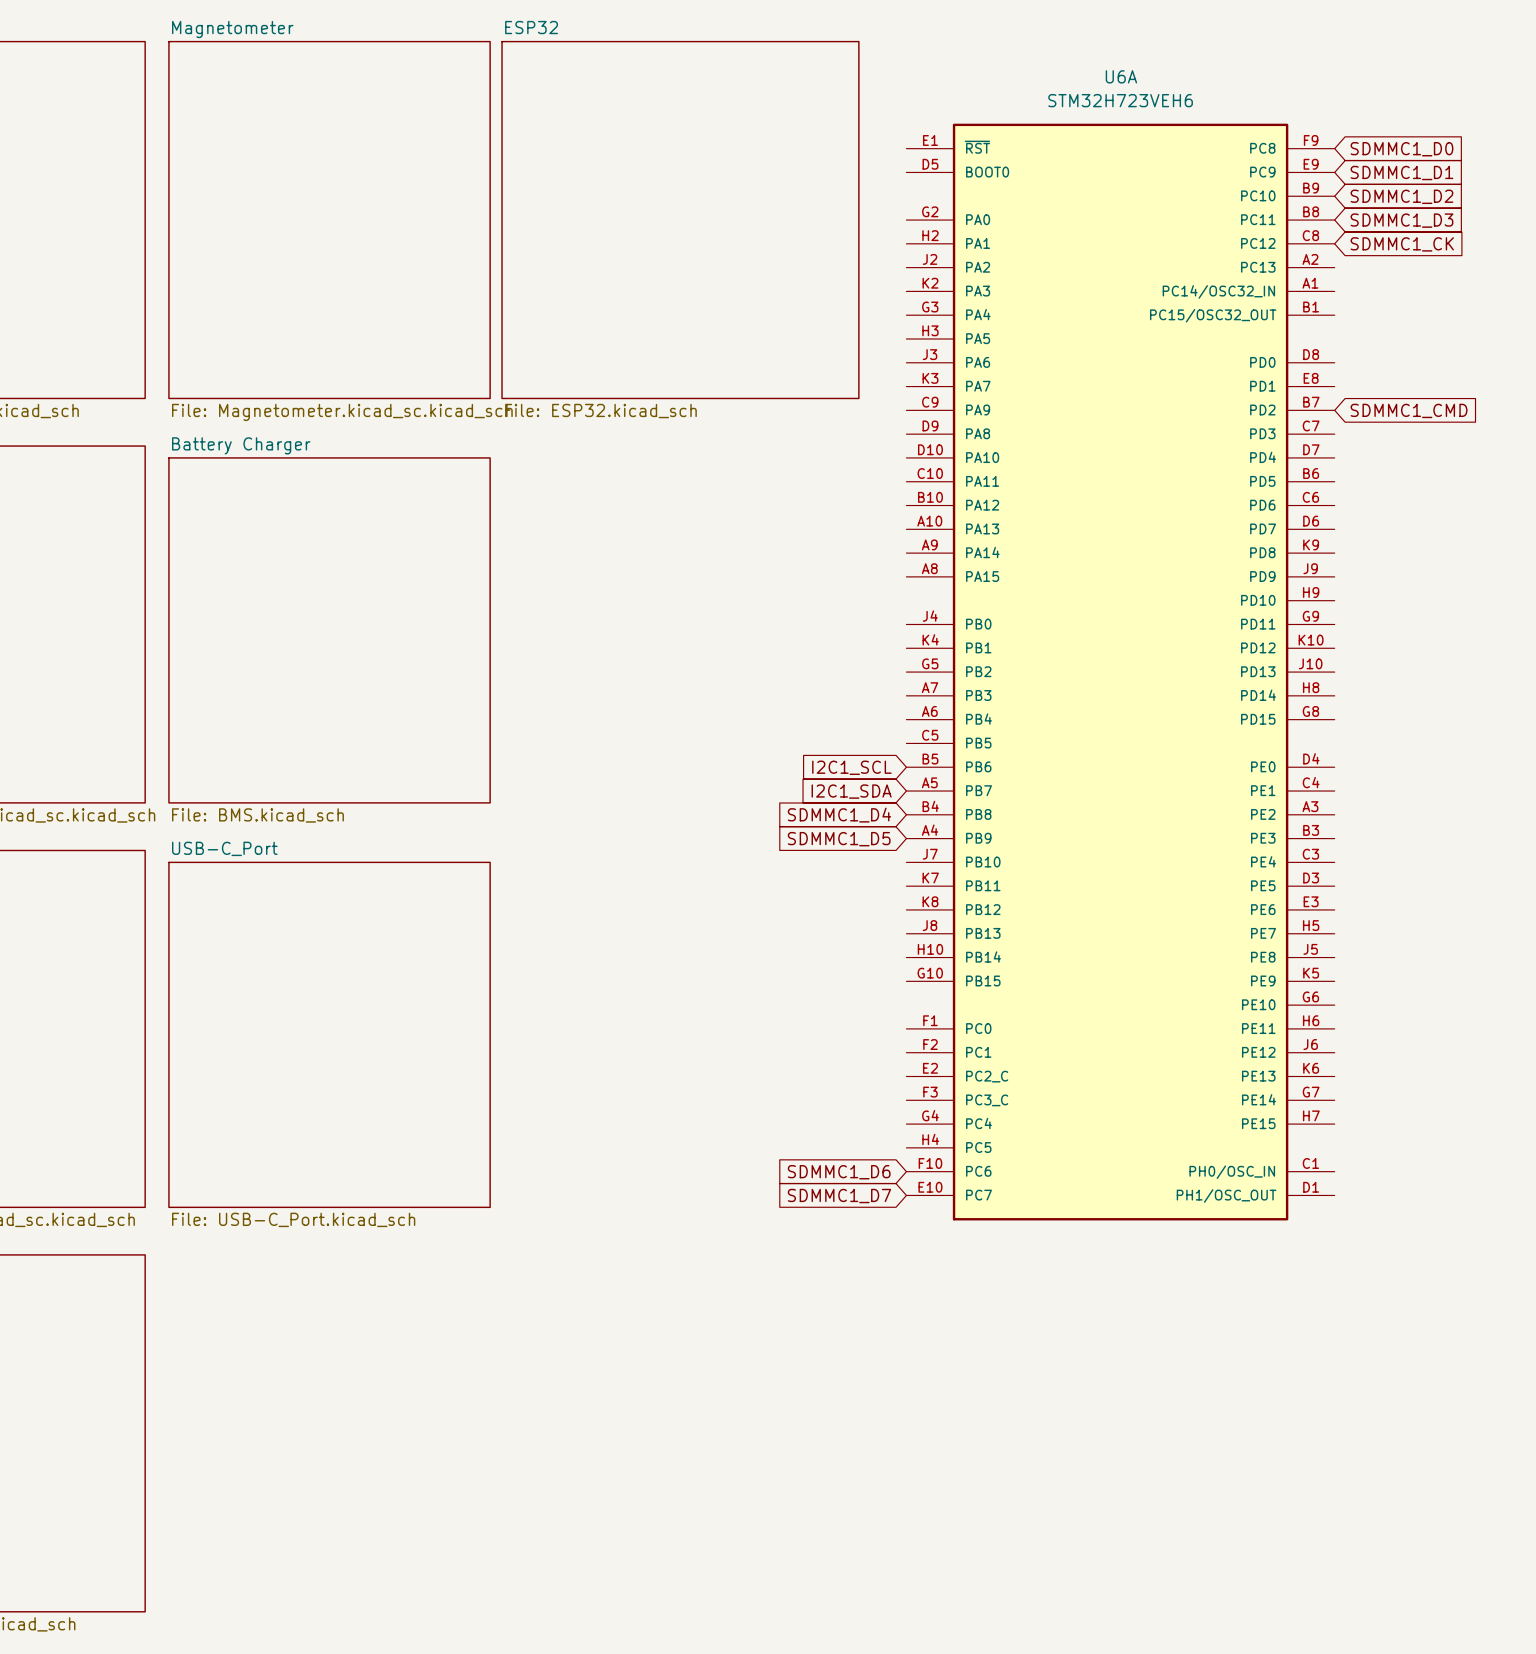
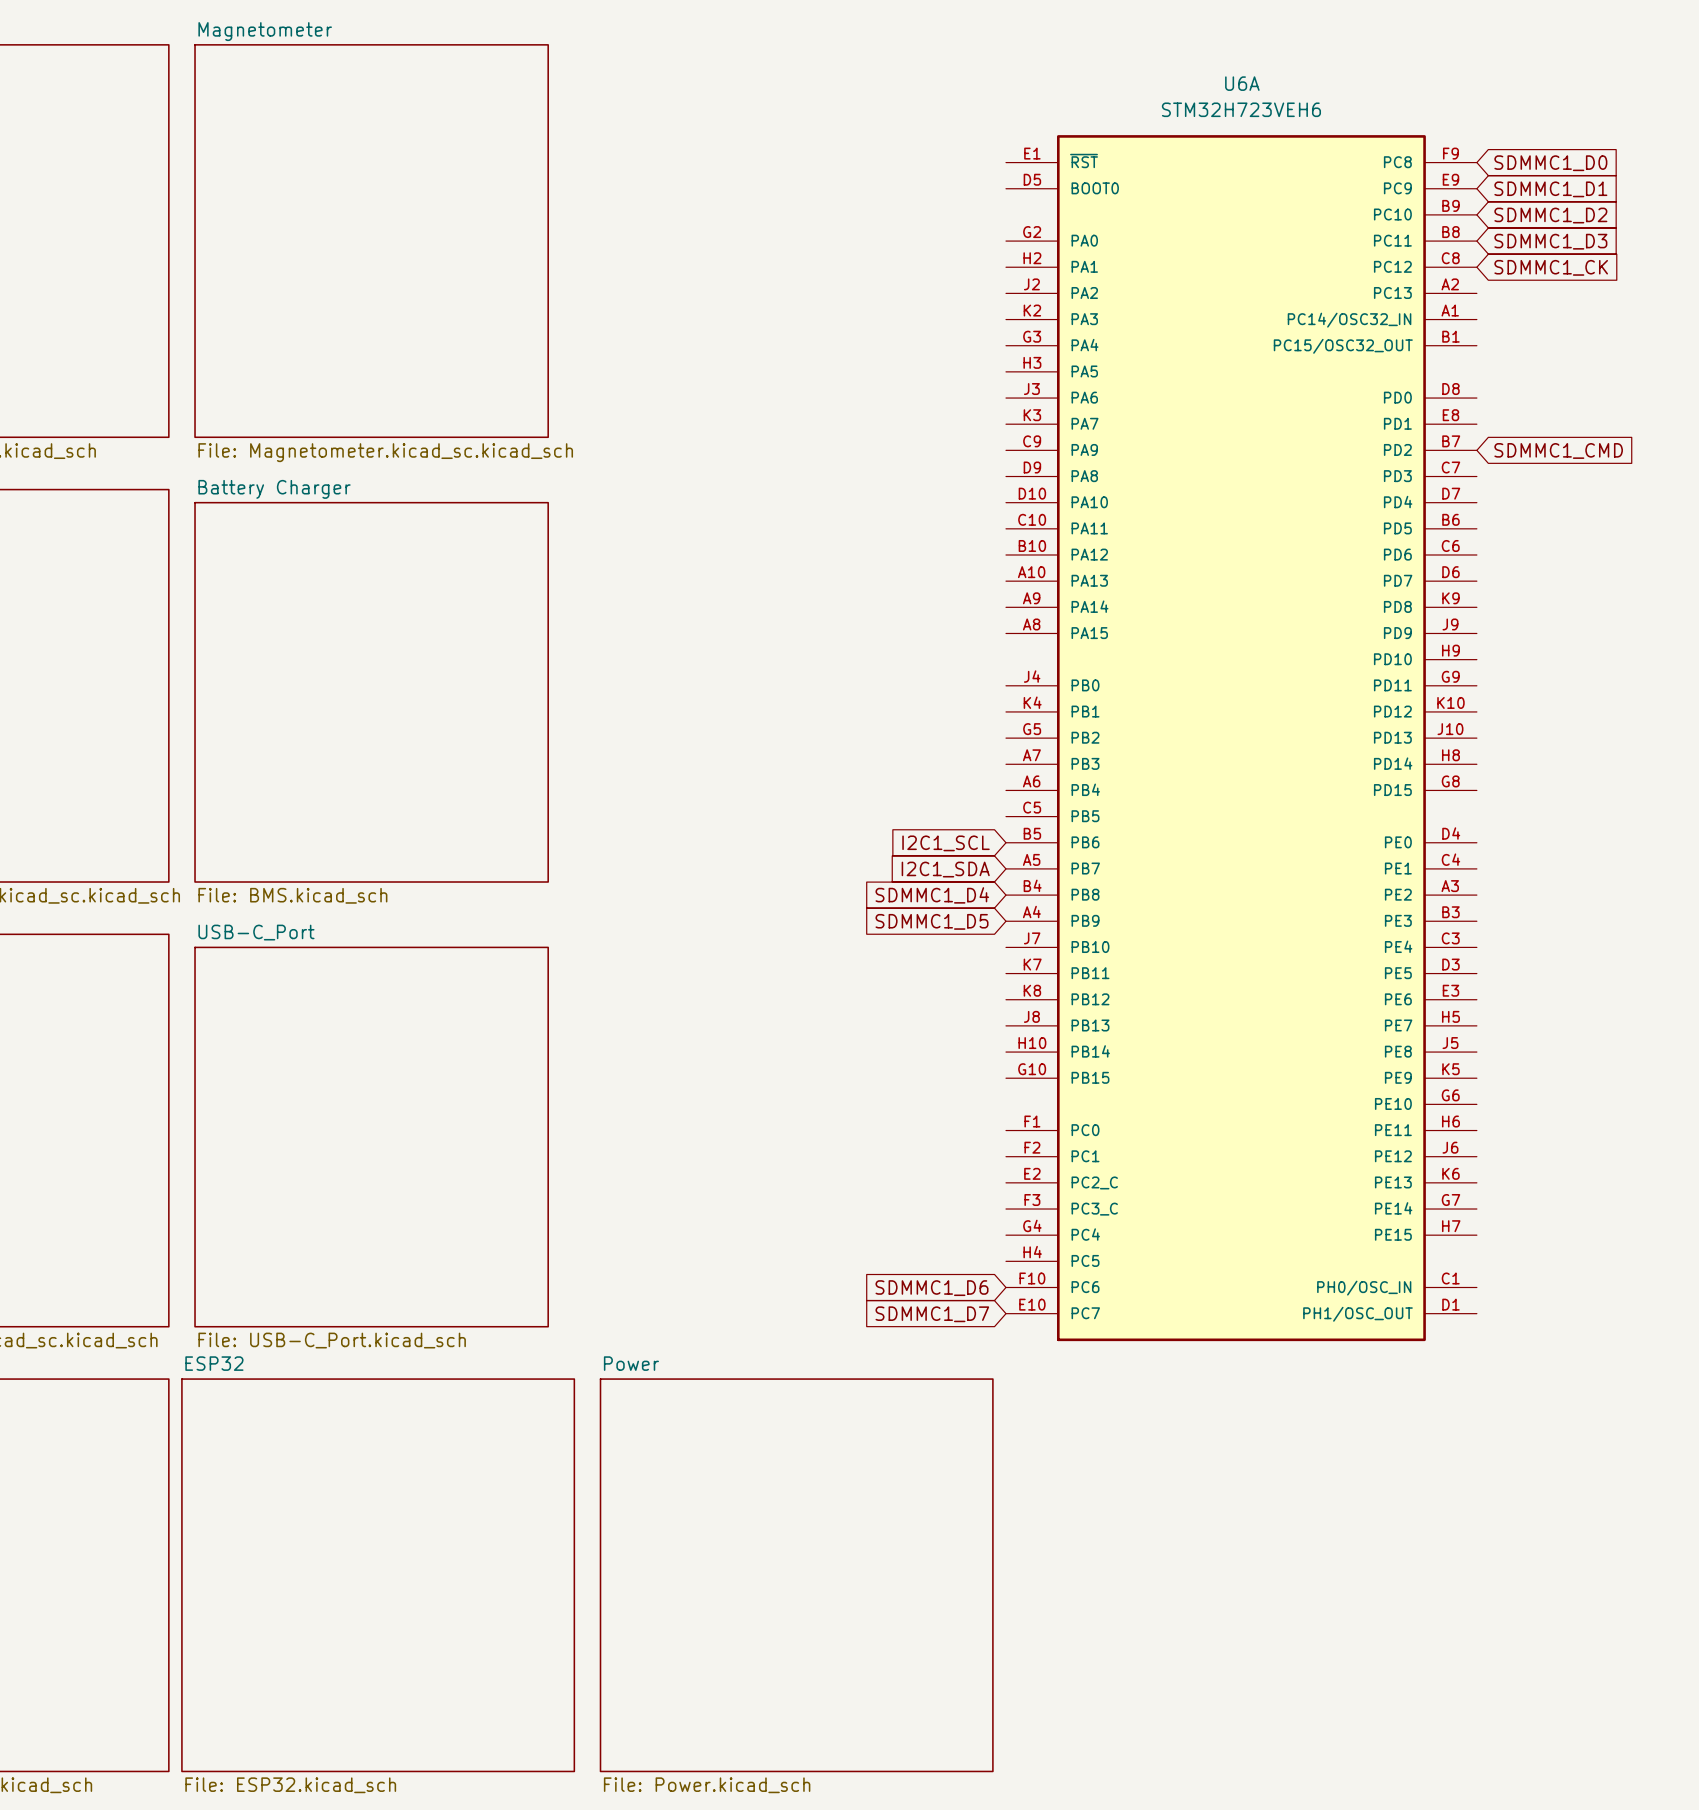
sheet ESP32 position: (680, 220) -> (378, 1575)
sheet Power: none -> File: Power.kicad_sch (796, 1575)

